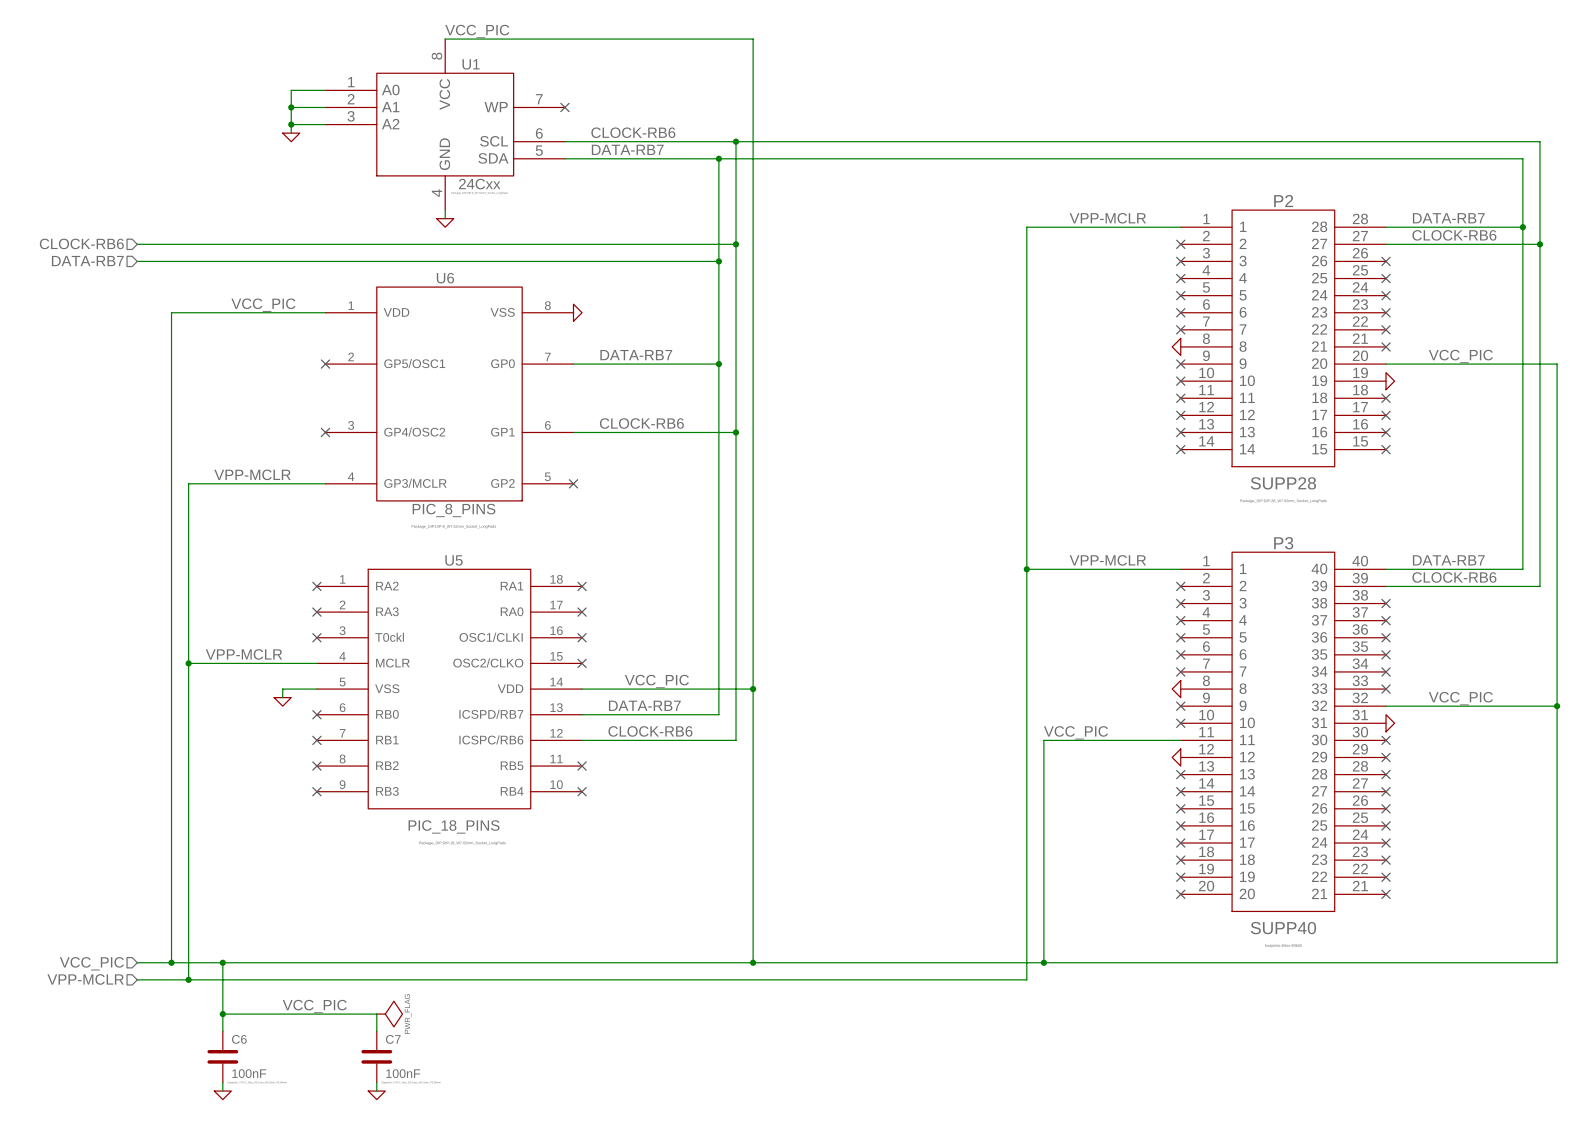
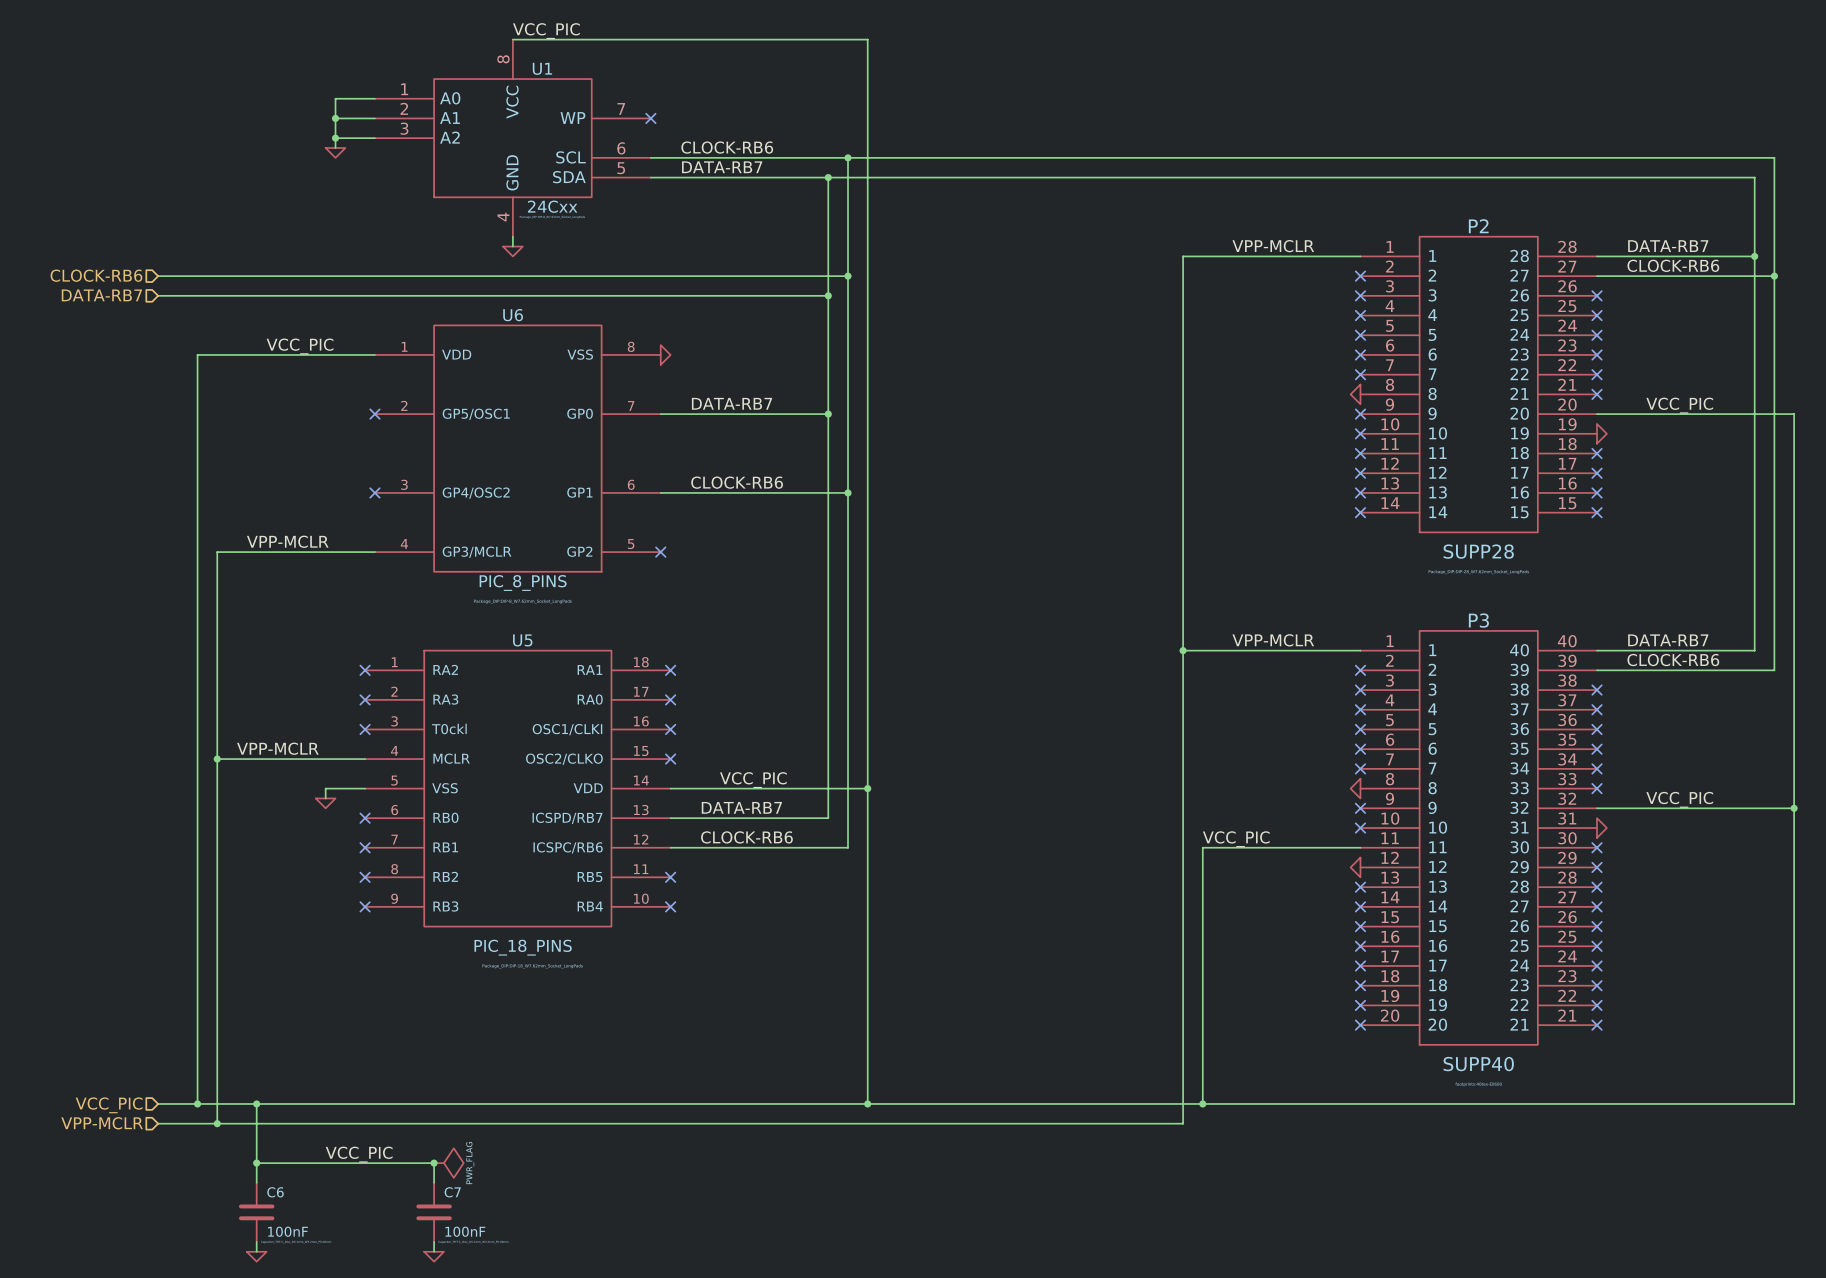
junction: none -> (434, 1163)

